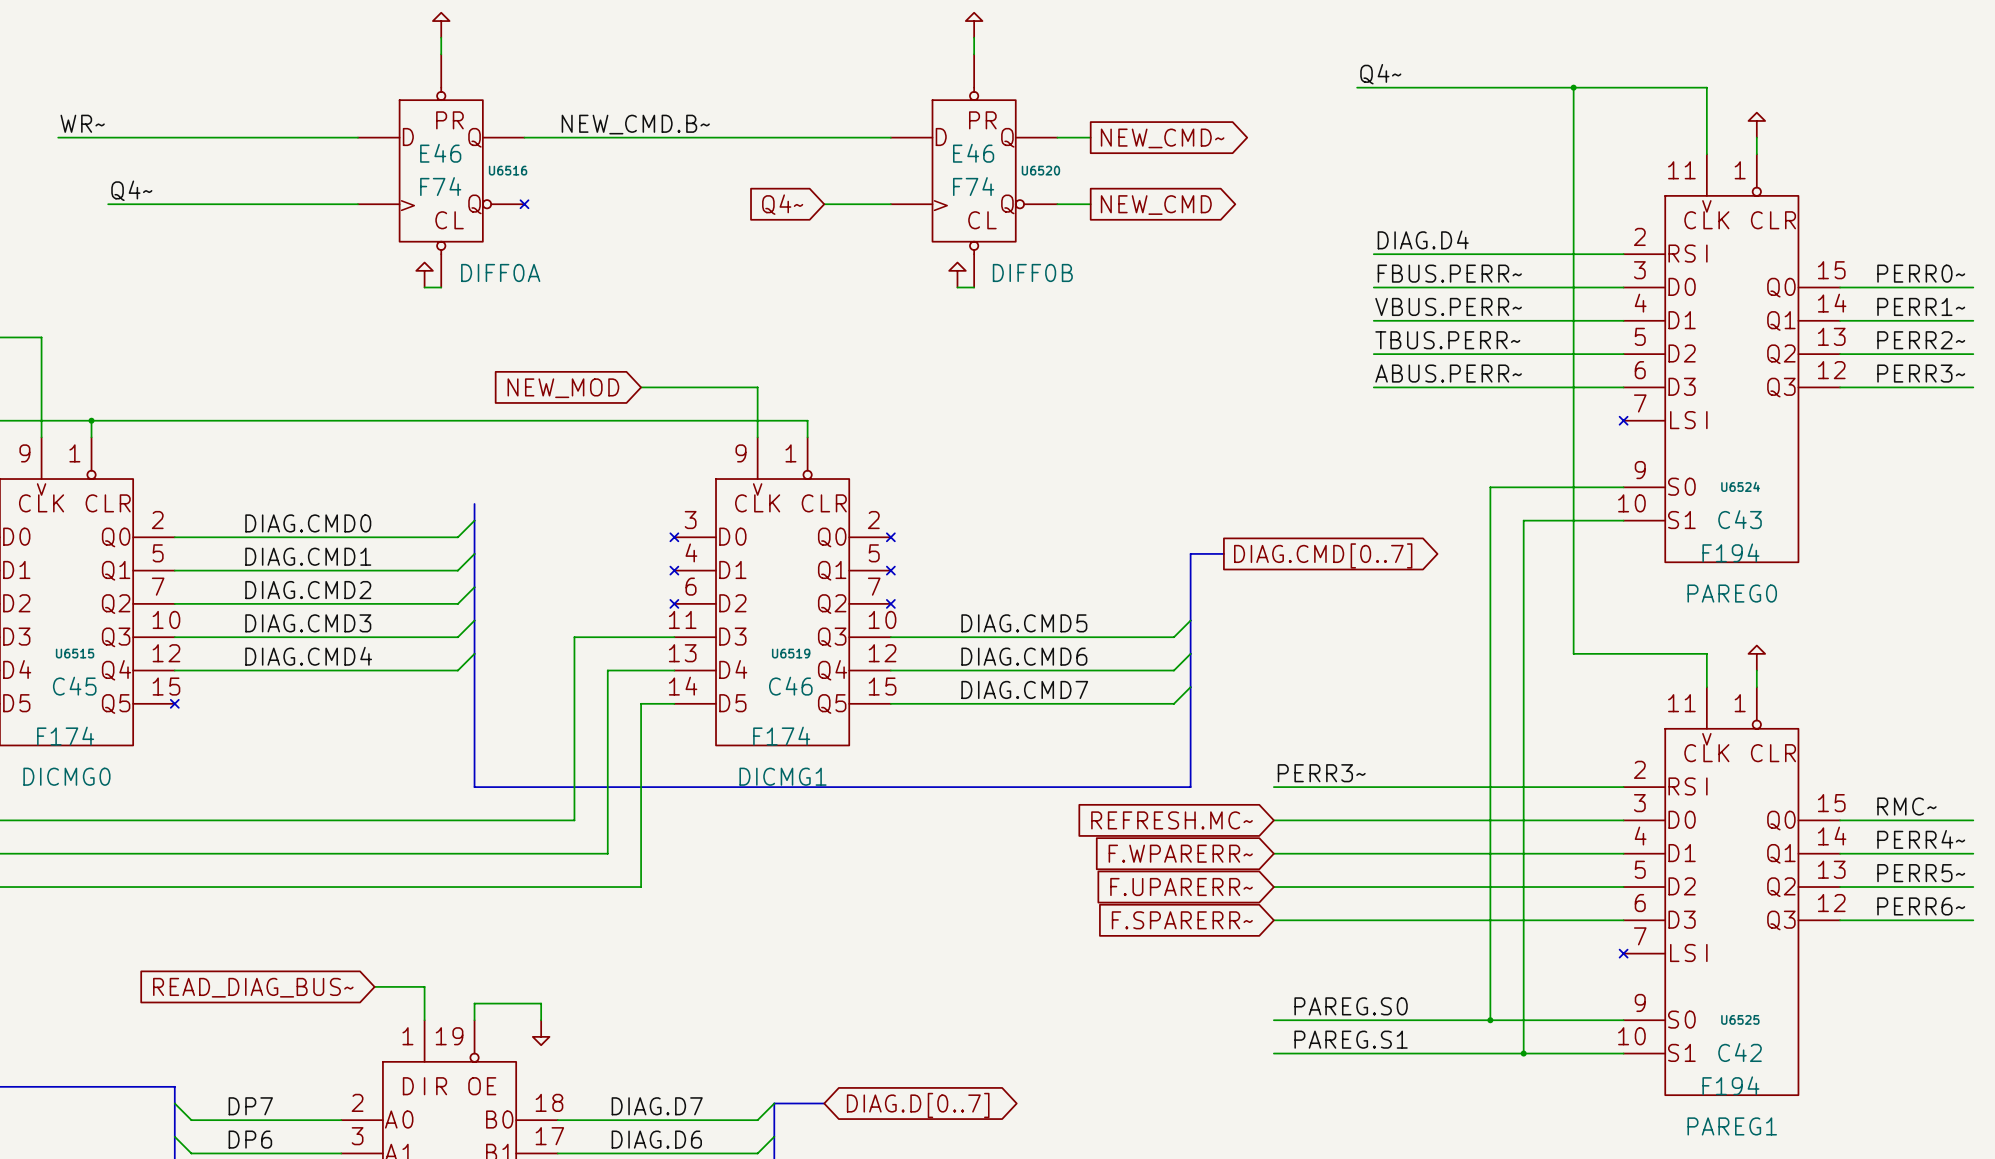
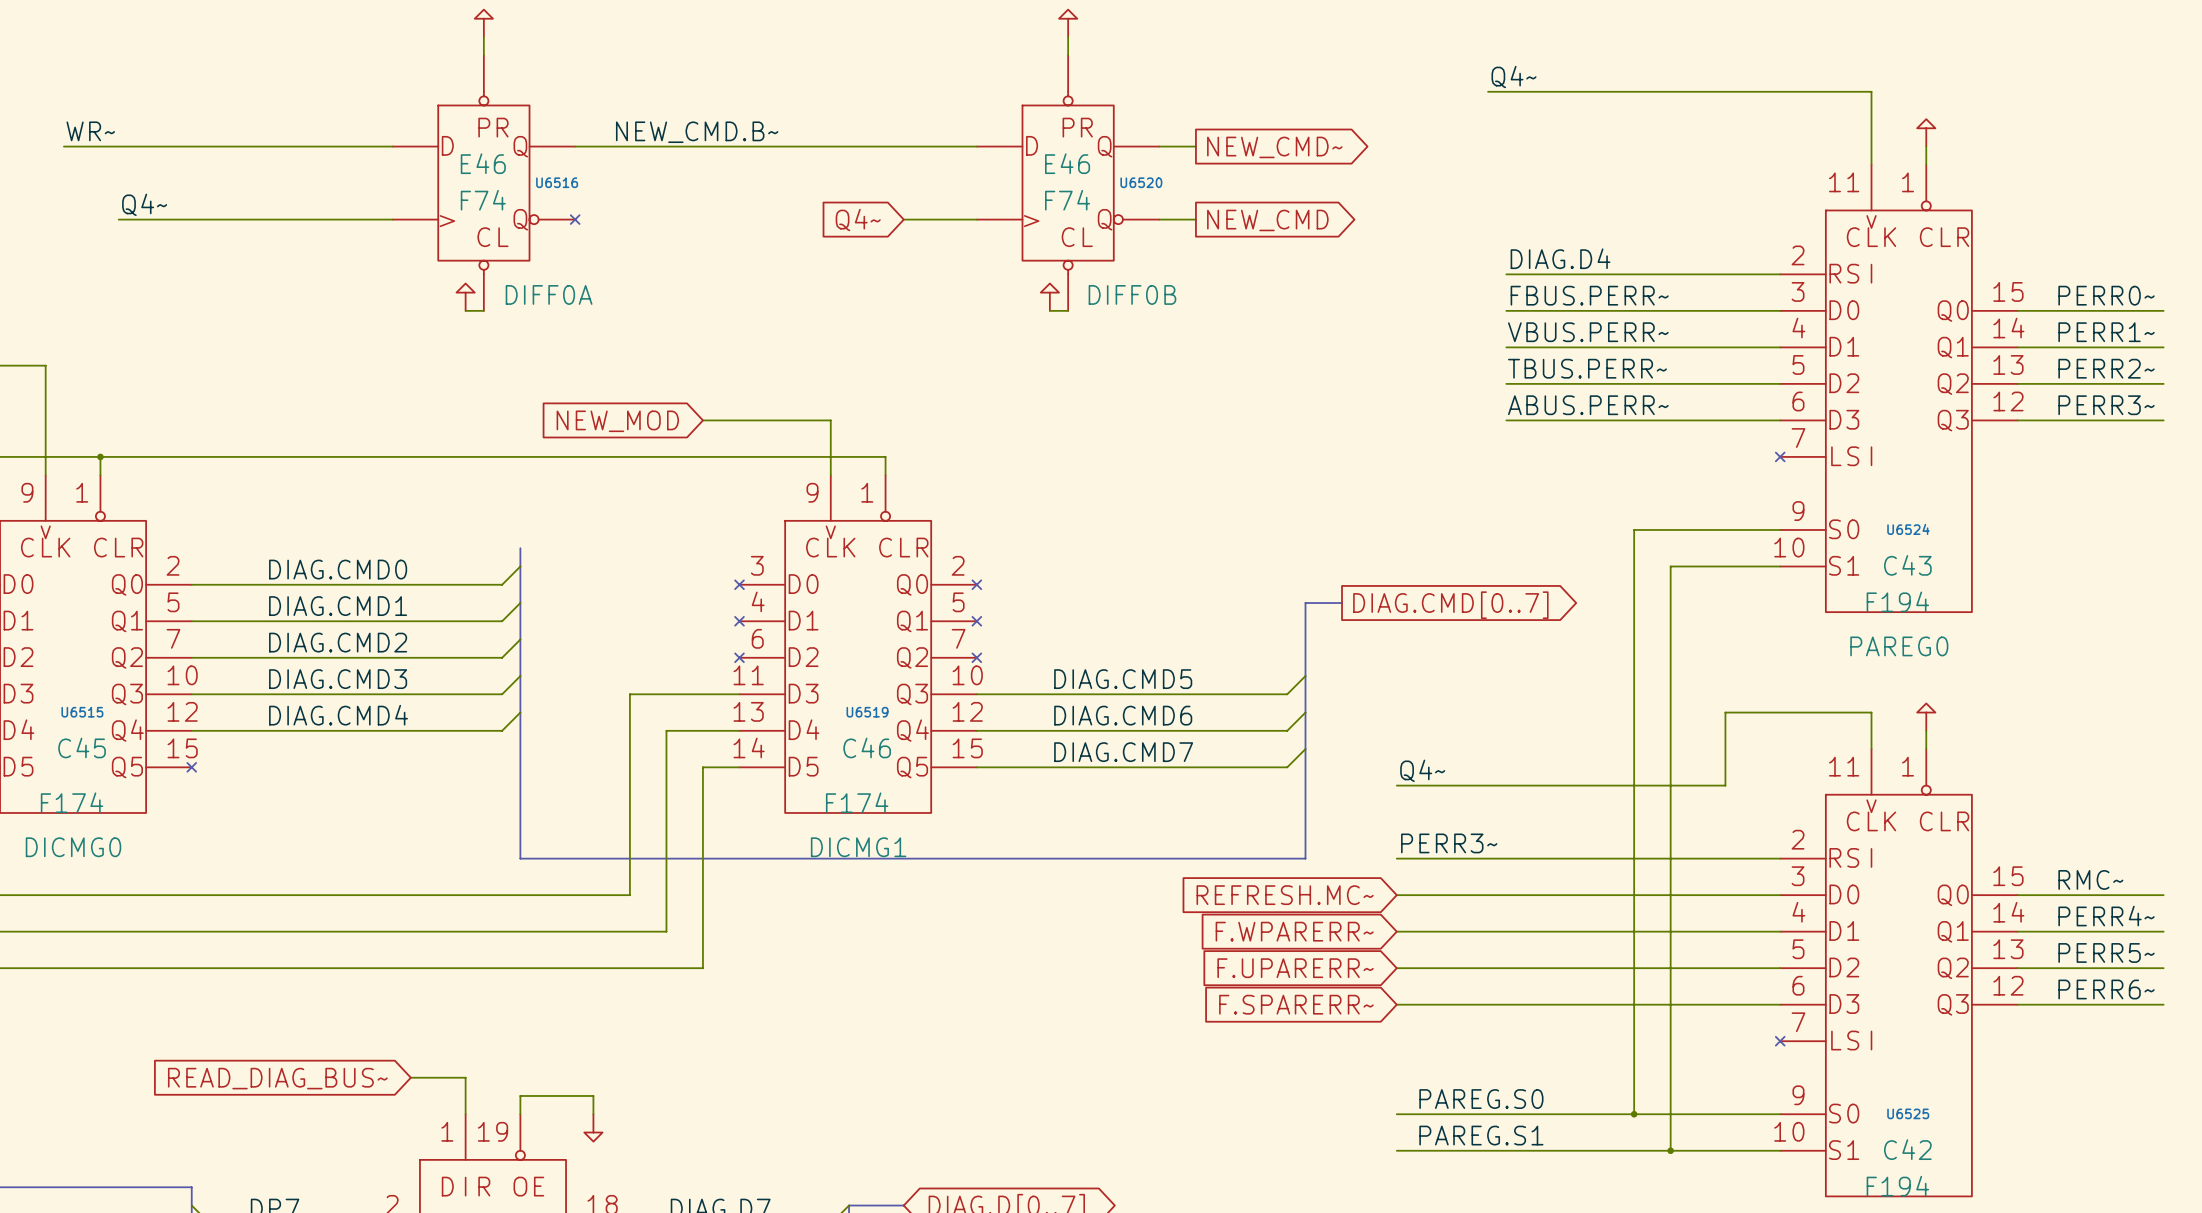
wire: (1573, 87) (1573, 653) -> (1396, 785) (1725, 785) (1725, 712)
junction: (1573, 87) -> none
label: none -> Q4~ (1422, 770)

